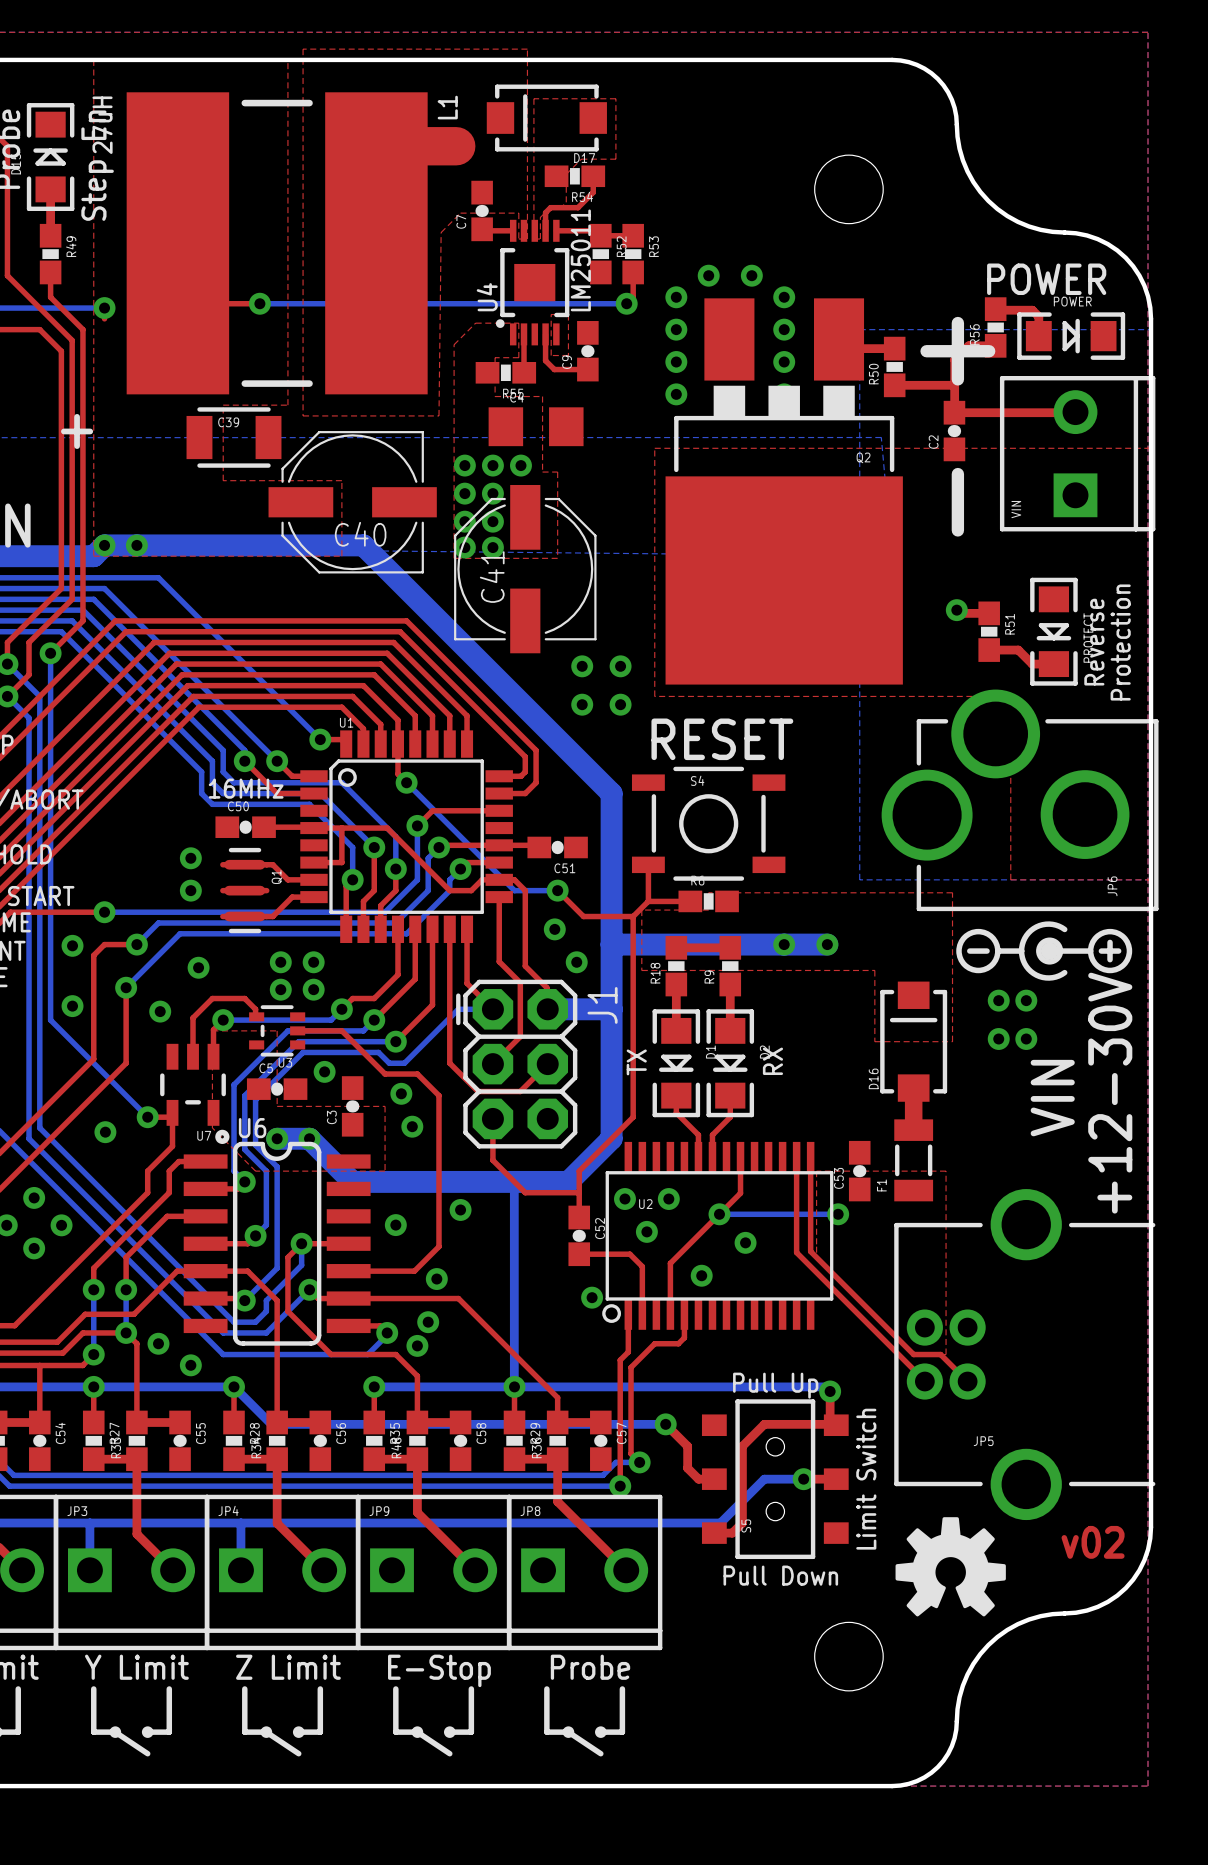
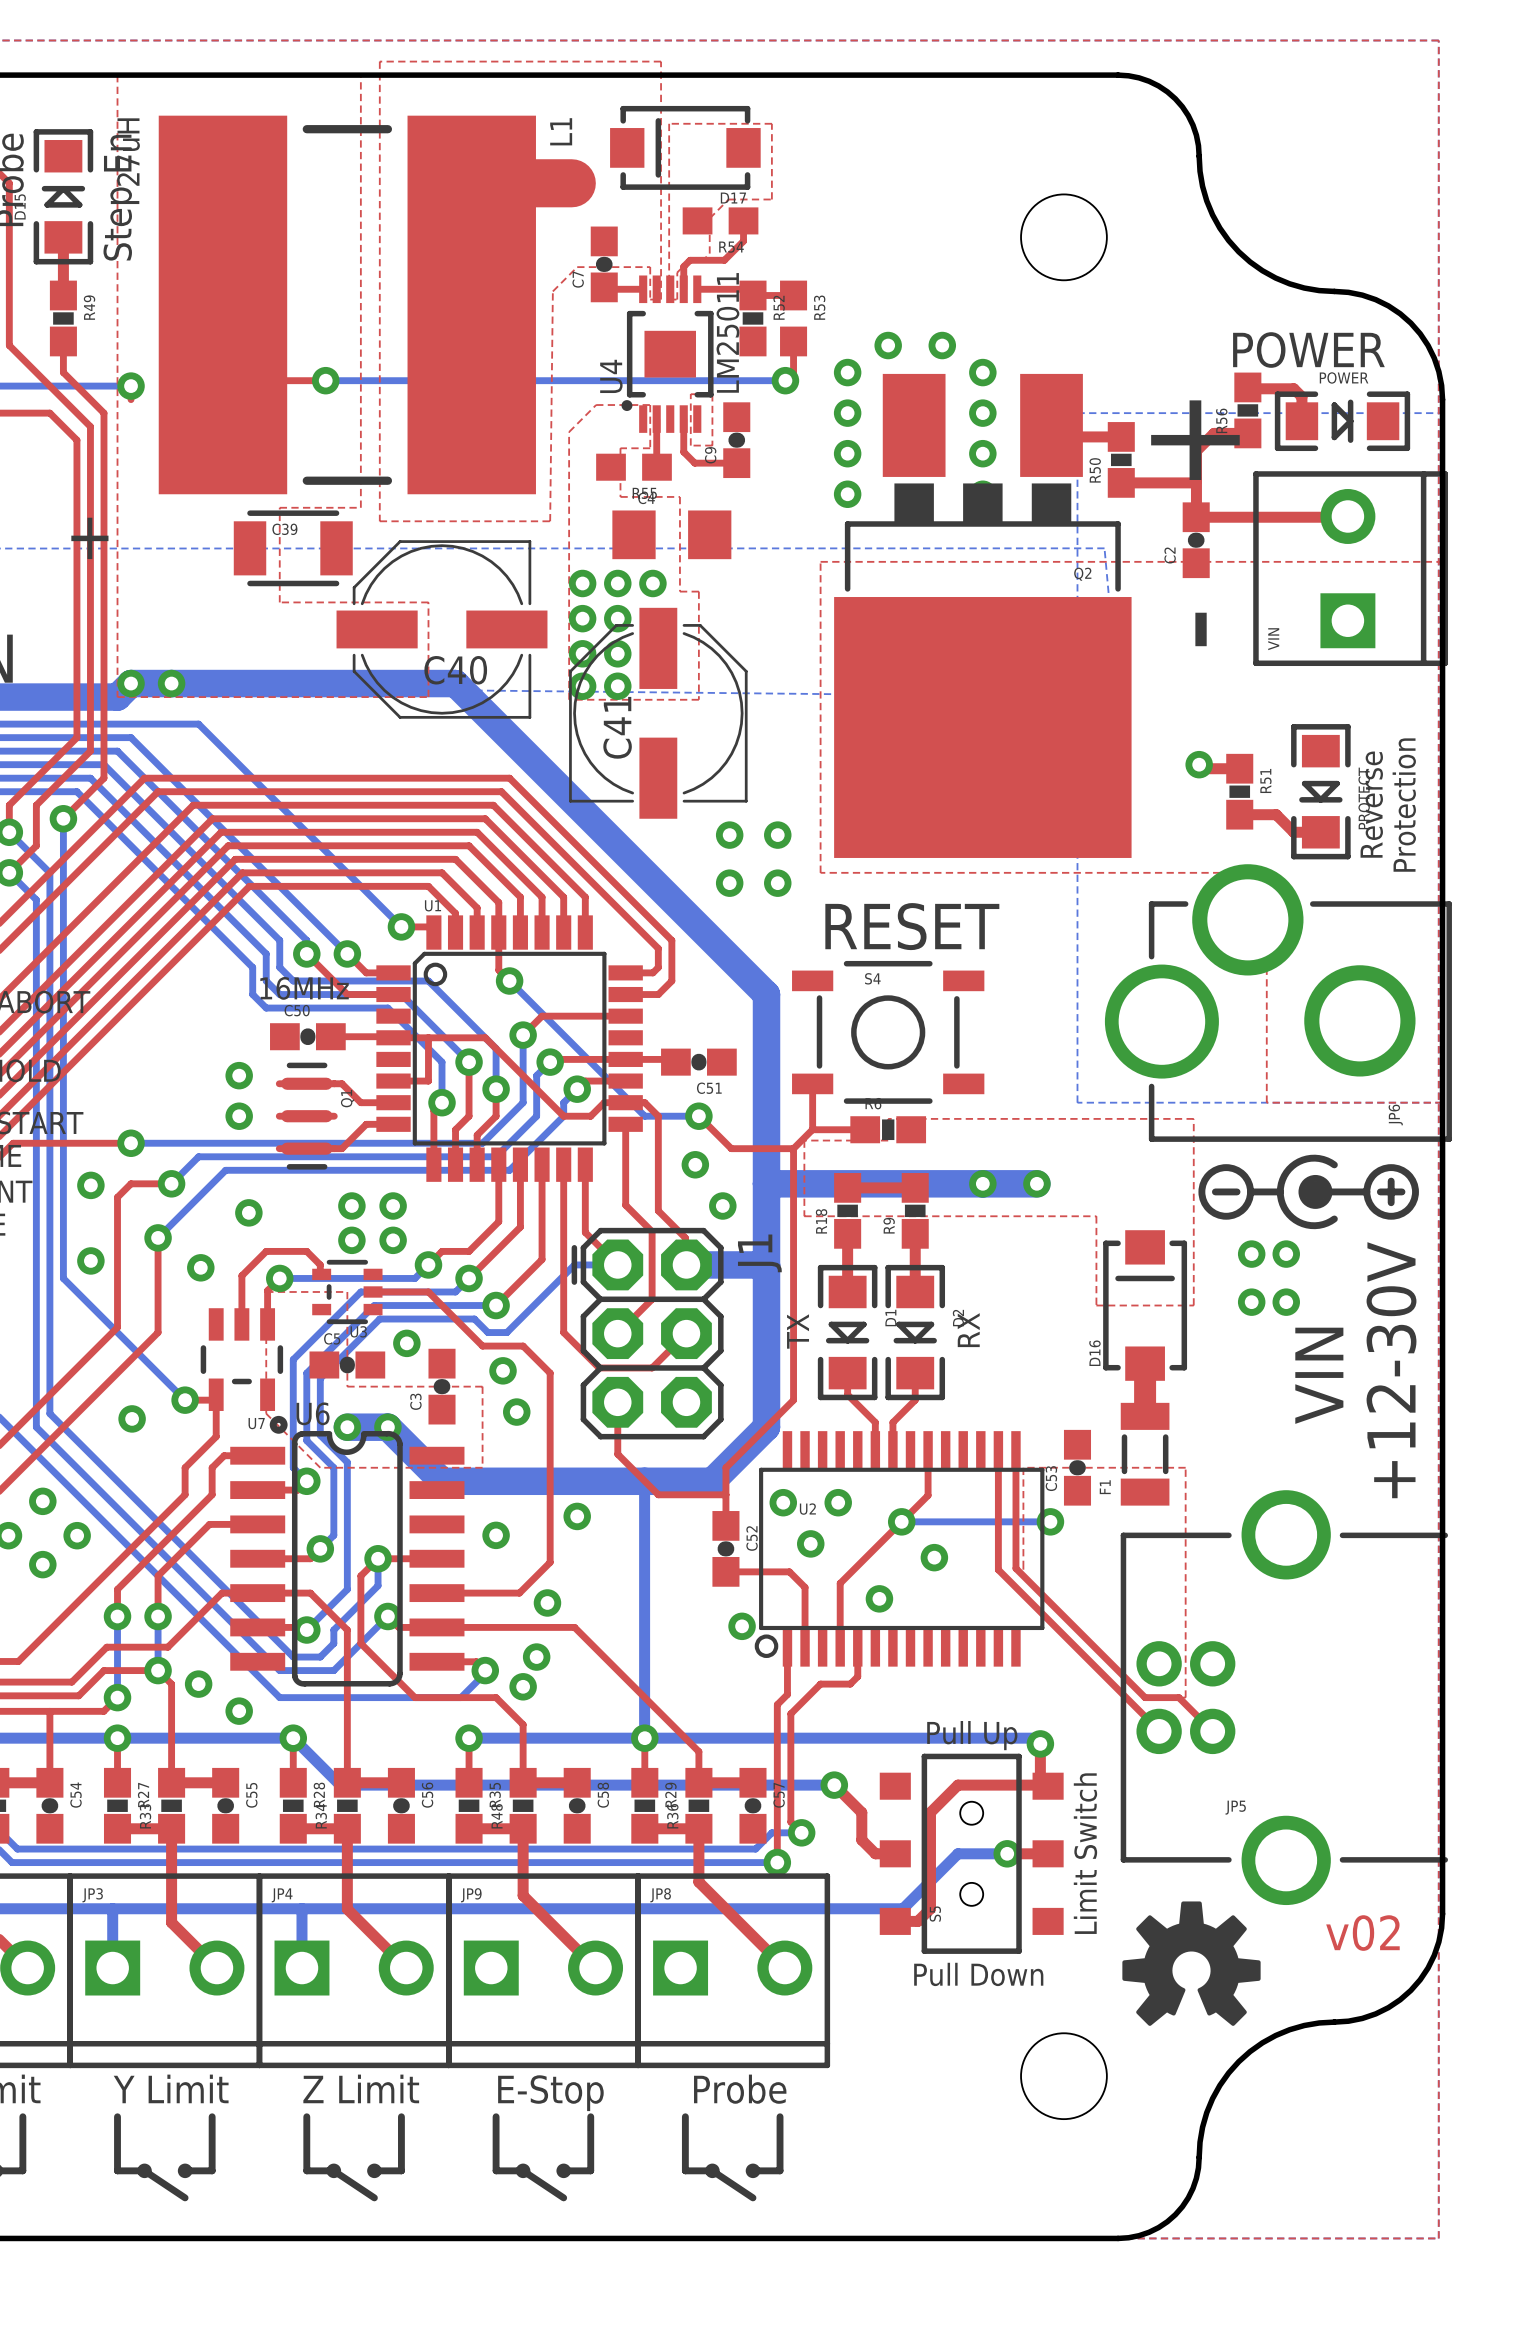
R54 footprint: [544, 165, 606, 188] -> [682, 207, 759, 235]
R53 footprint: [622, 223, 644, 285] -> [780, 280, 808, 357]
R55 footprint: [475, 362, 537, 384] -> [596, 453, 672, 481]

